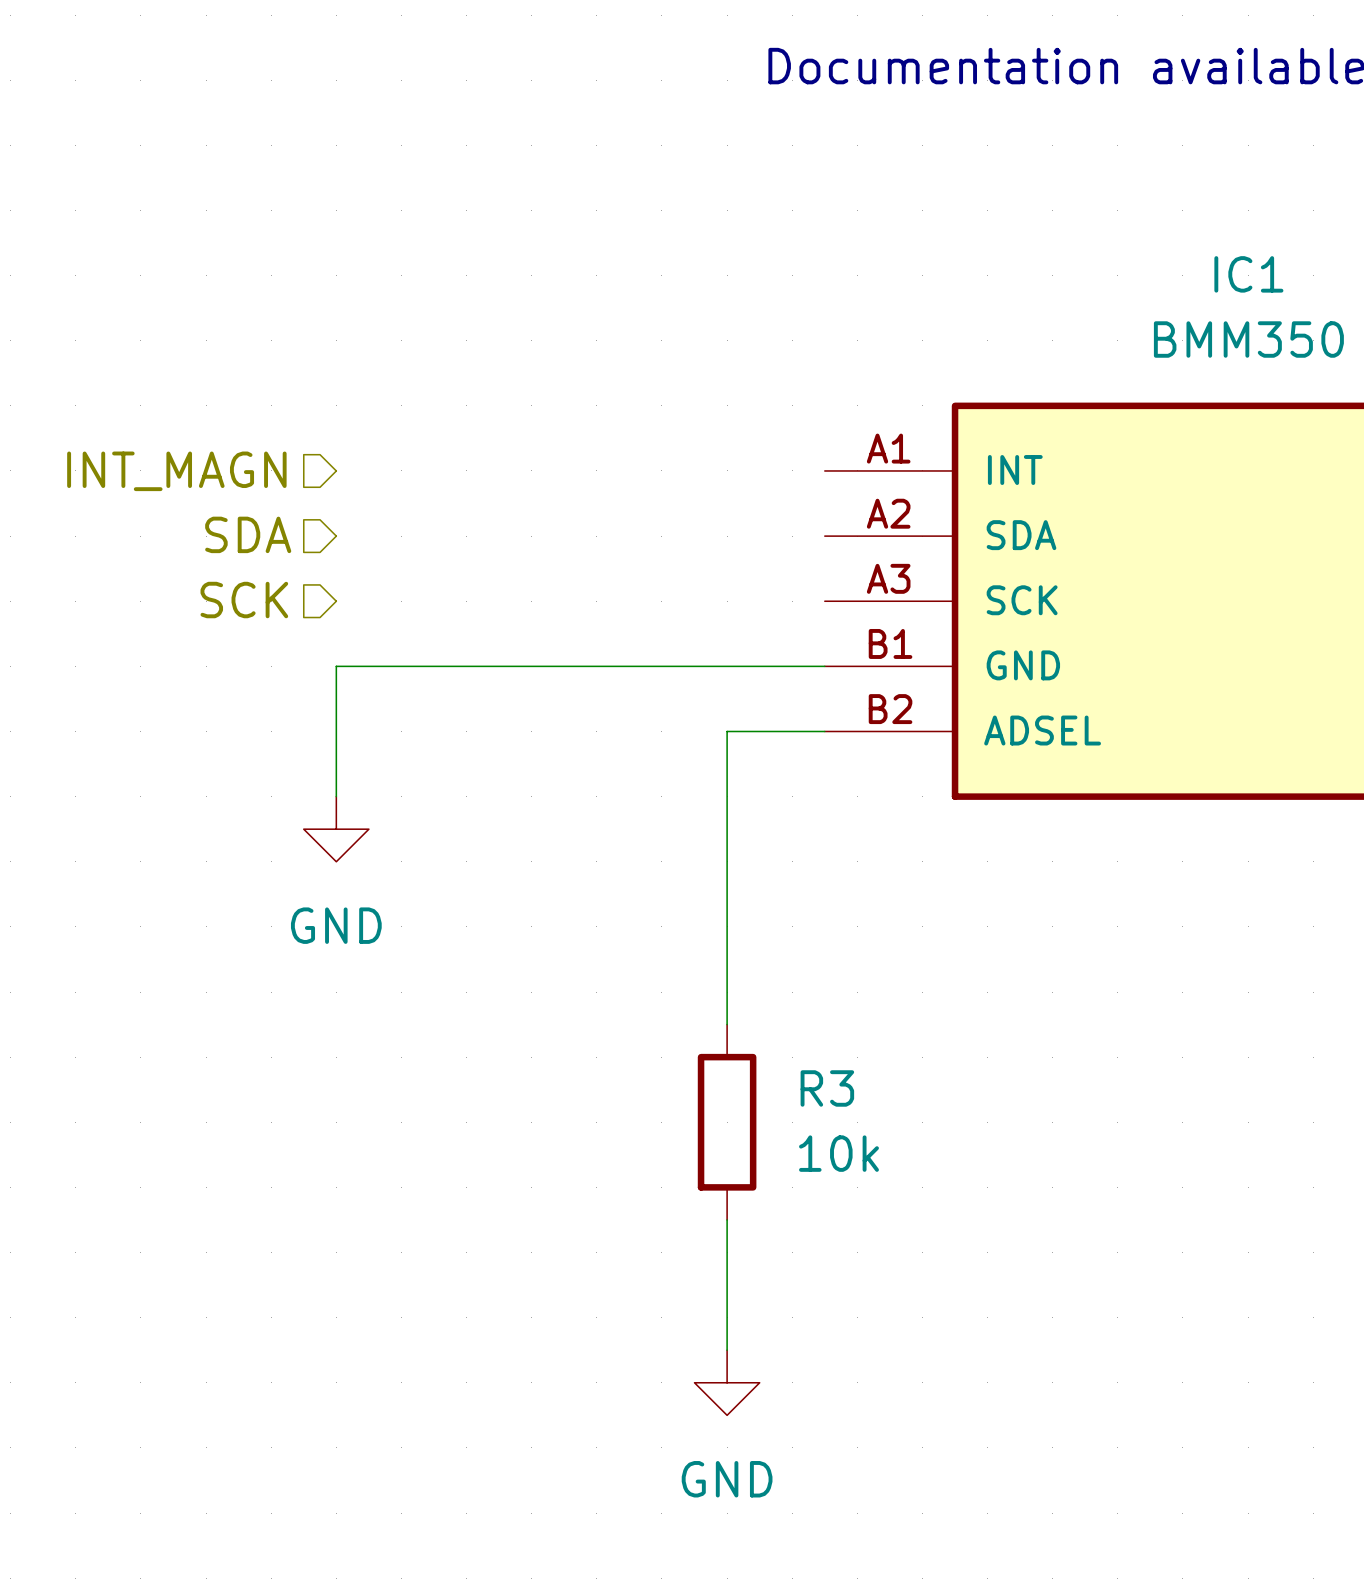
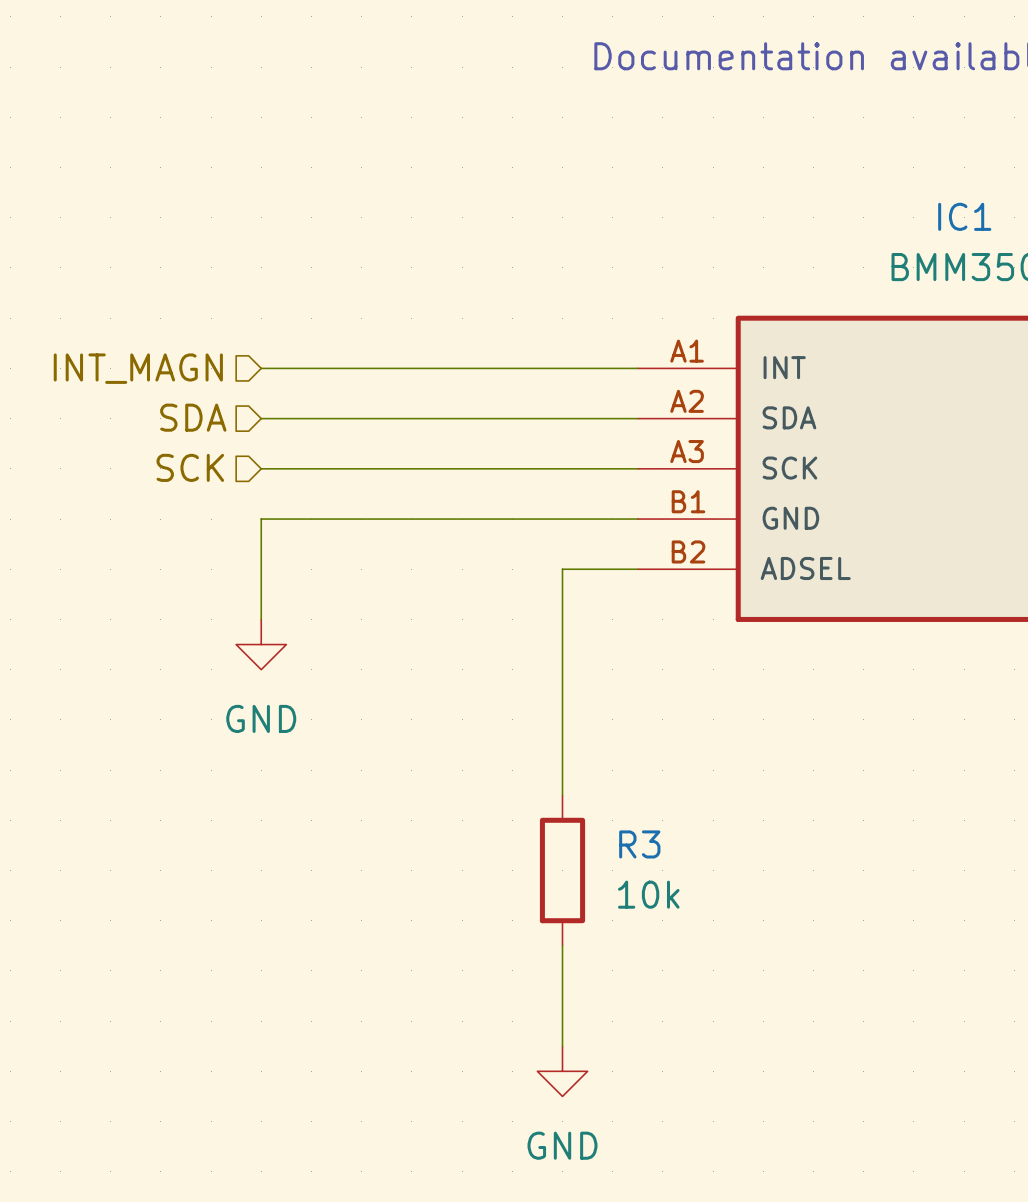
wire: none -> (261, 368) (637, 368)
wire: none -> (261, 418) (637, 418)
wire: none -> (261, 468) (637, 468)

